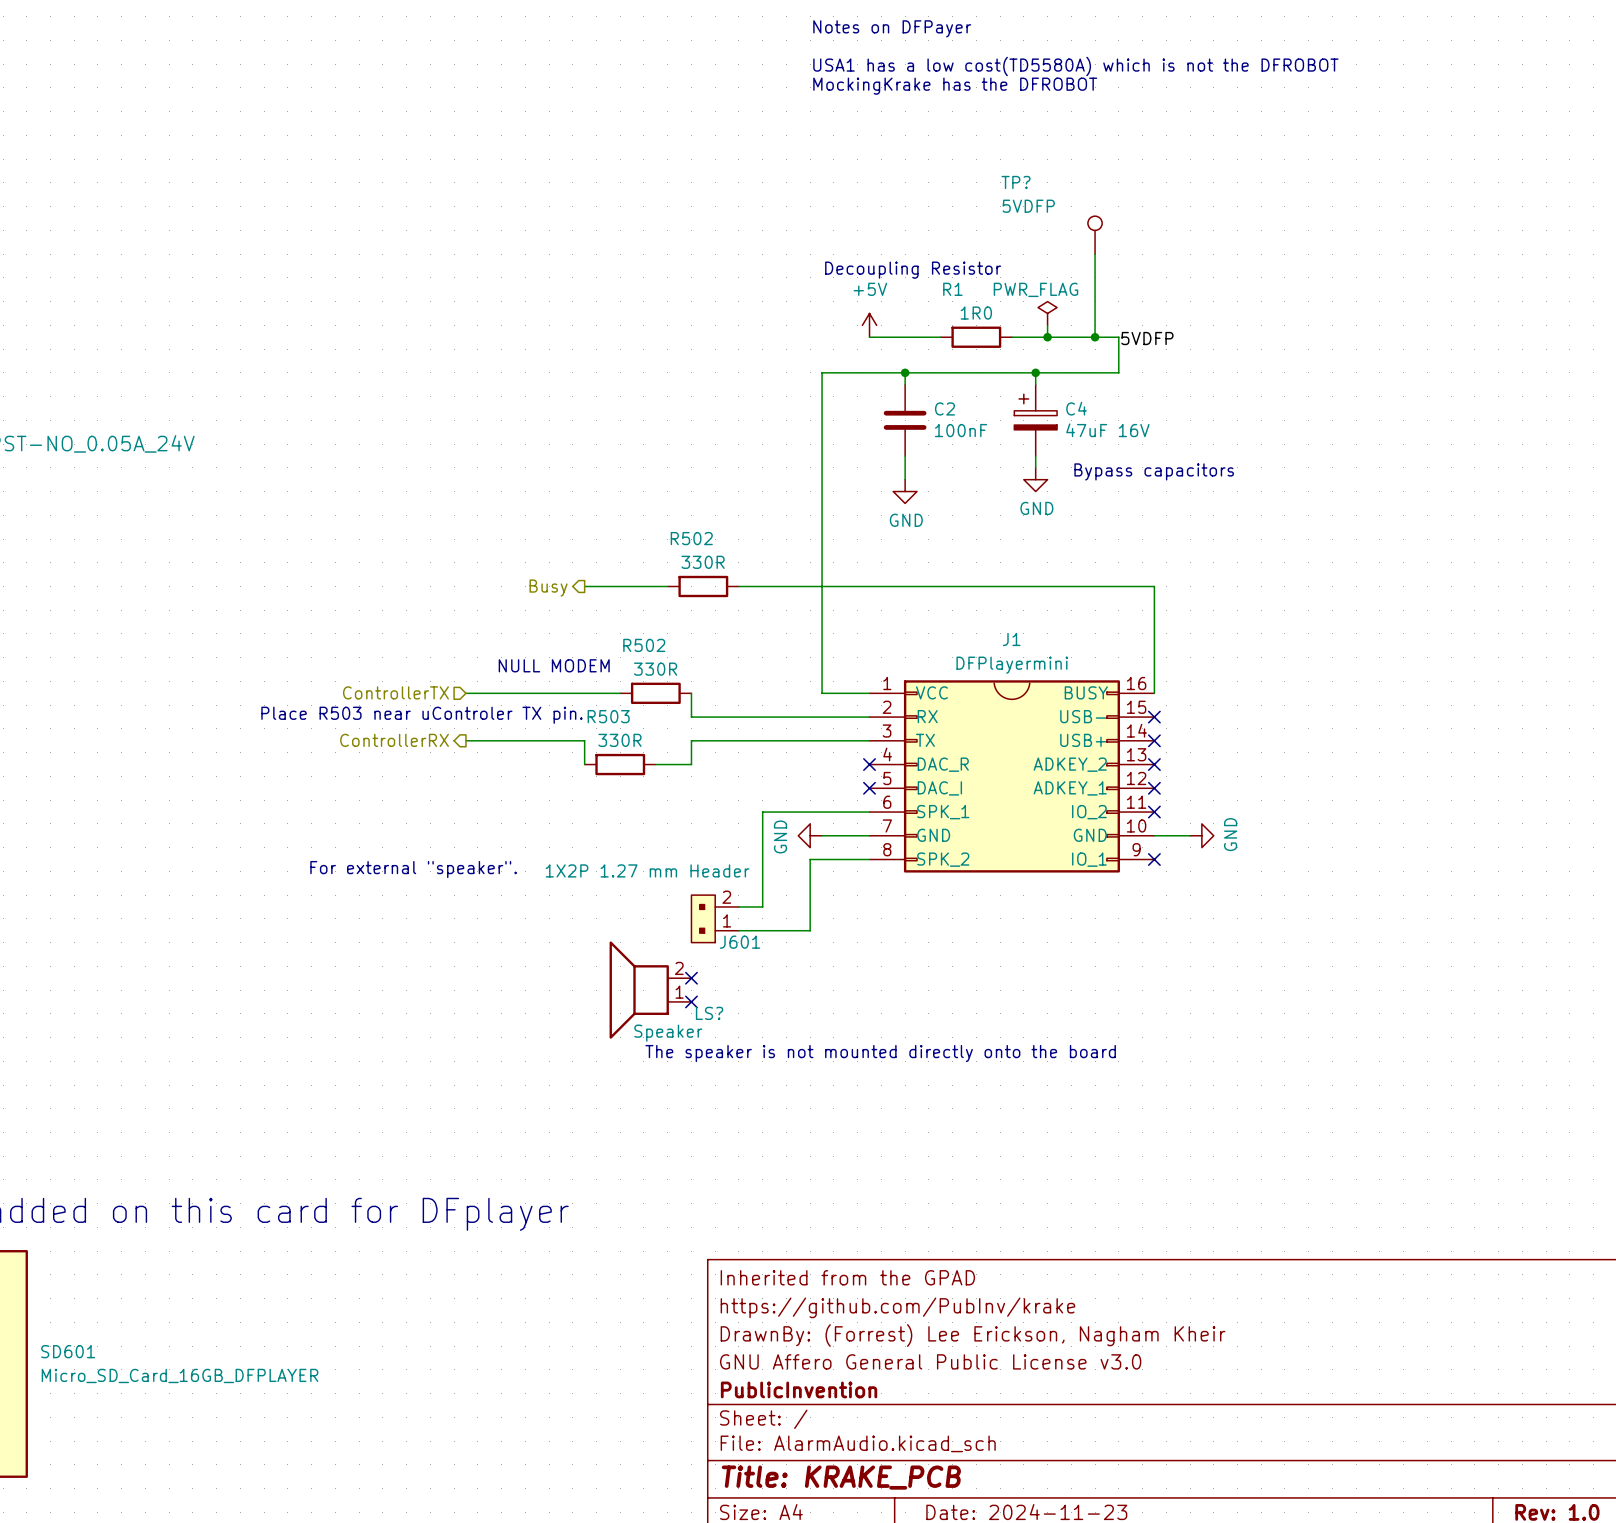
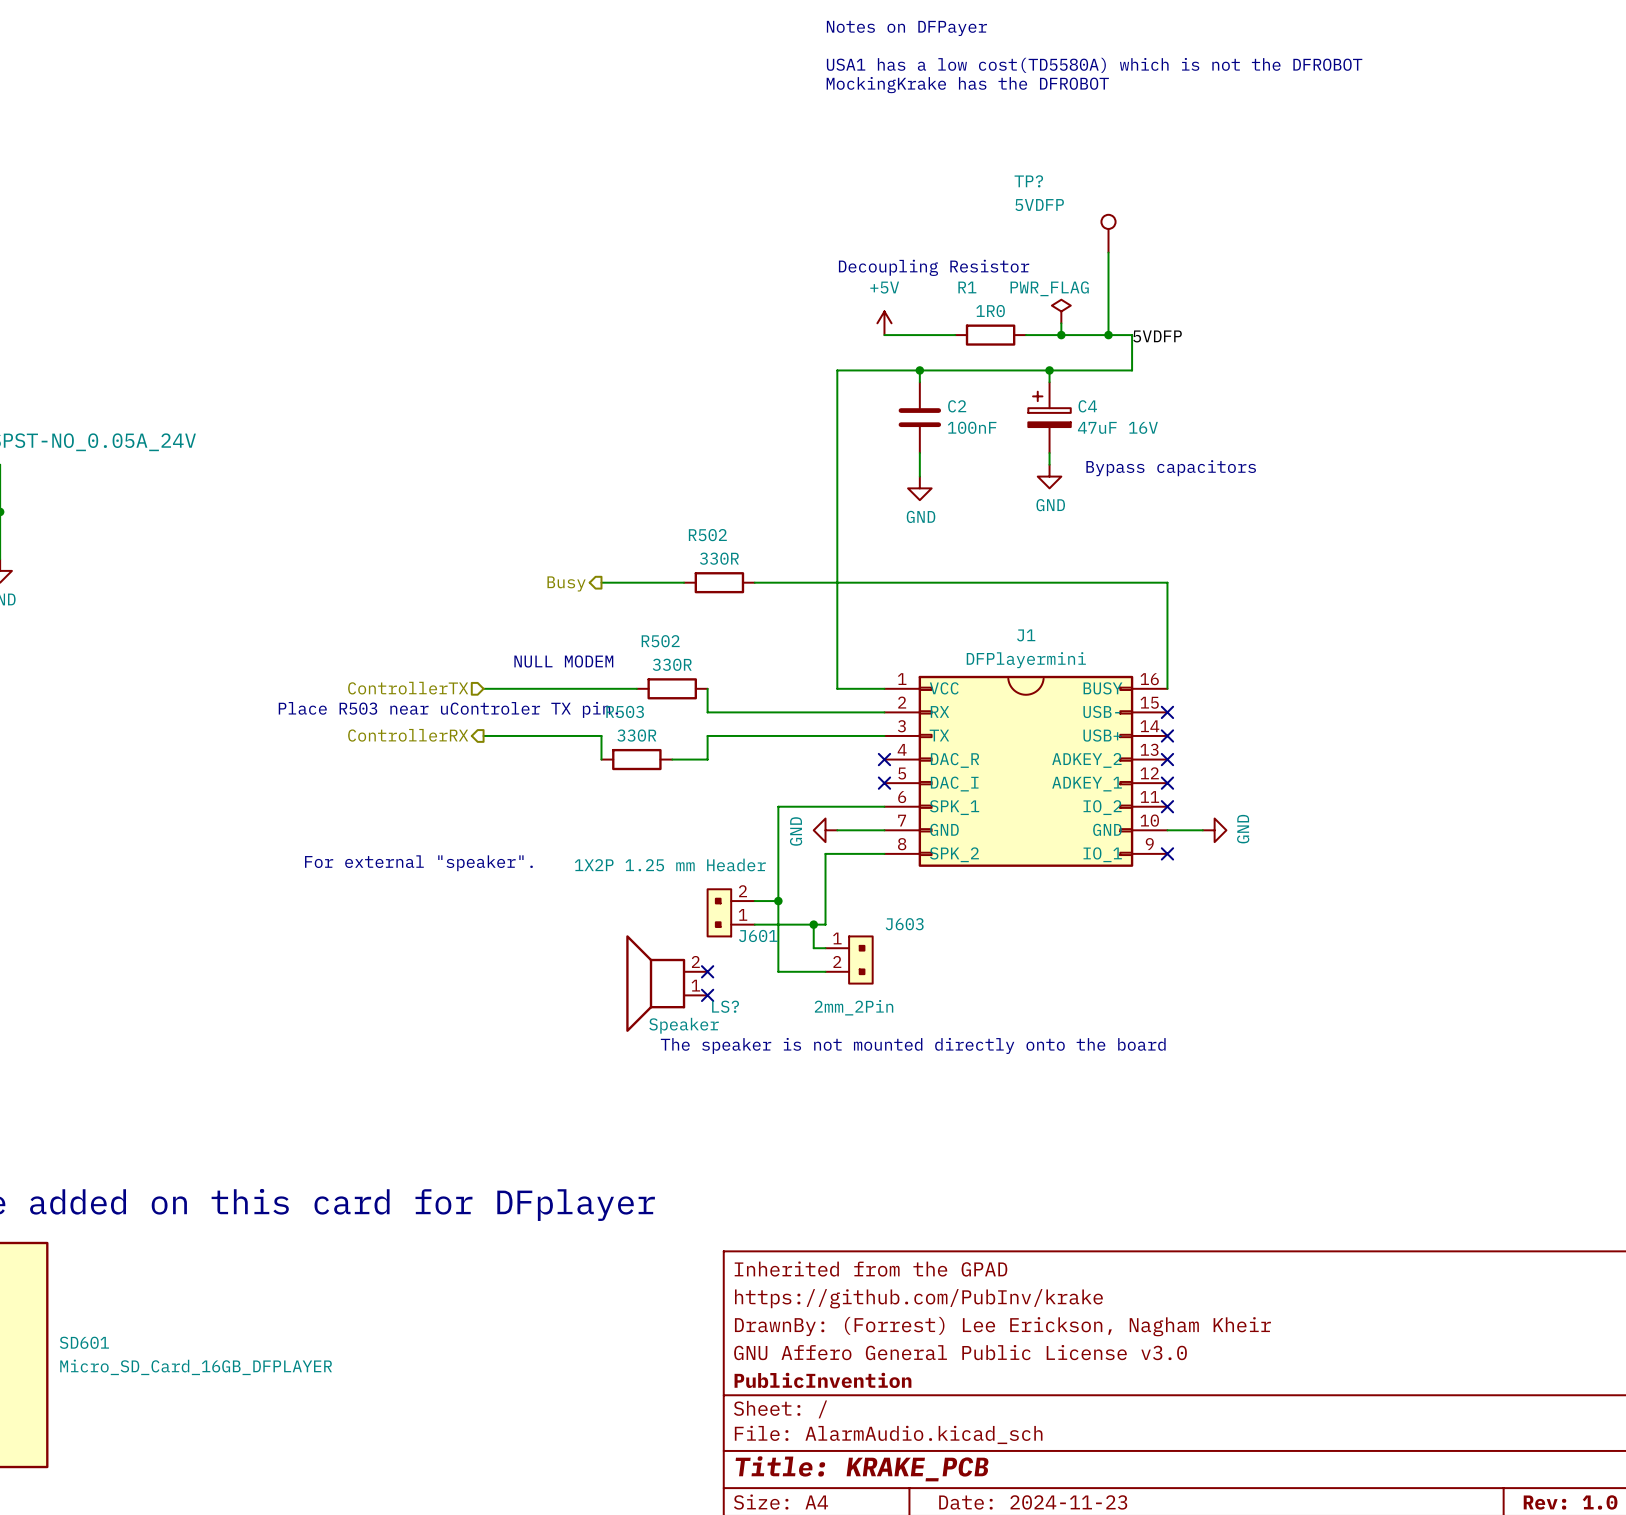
J601 value: 1X2P 1.27 mm Header (647, 870) -> 1X2P 1.25 mm Header (670, 864)
wire: none -> (778, 901) (778, 971) (825, 971)
junction: none -> (778, 901)
wire: none -> (813, 924) (813, 948) (825, 948)
junction: none -> (813, 924)
J603: none -> 2mm_2Pin (849, 960)

